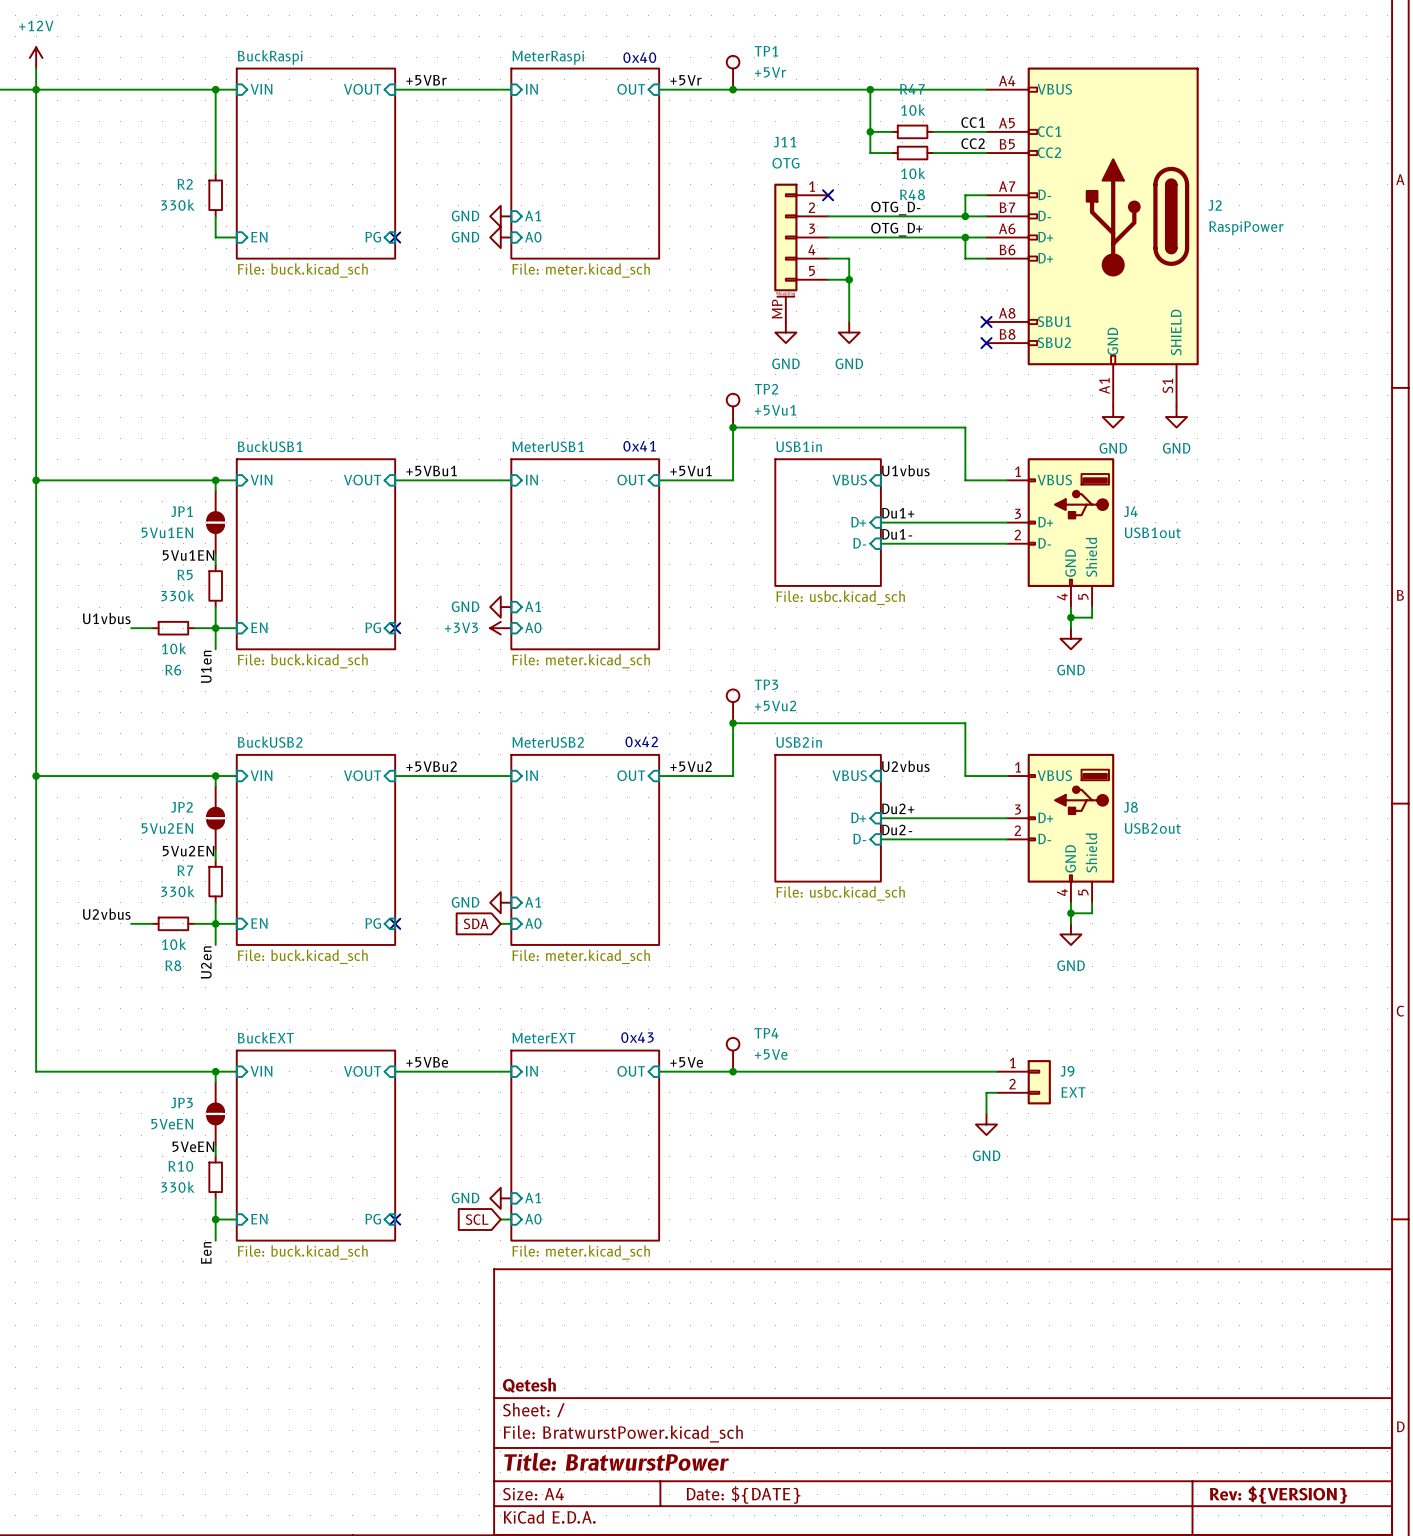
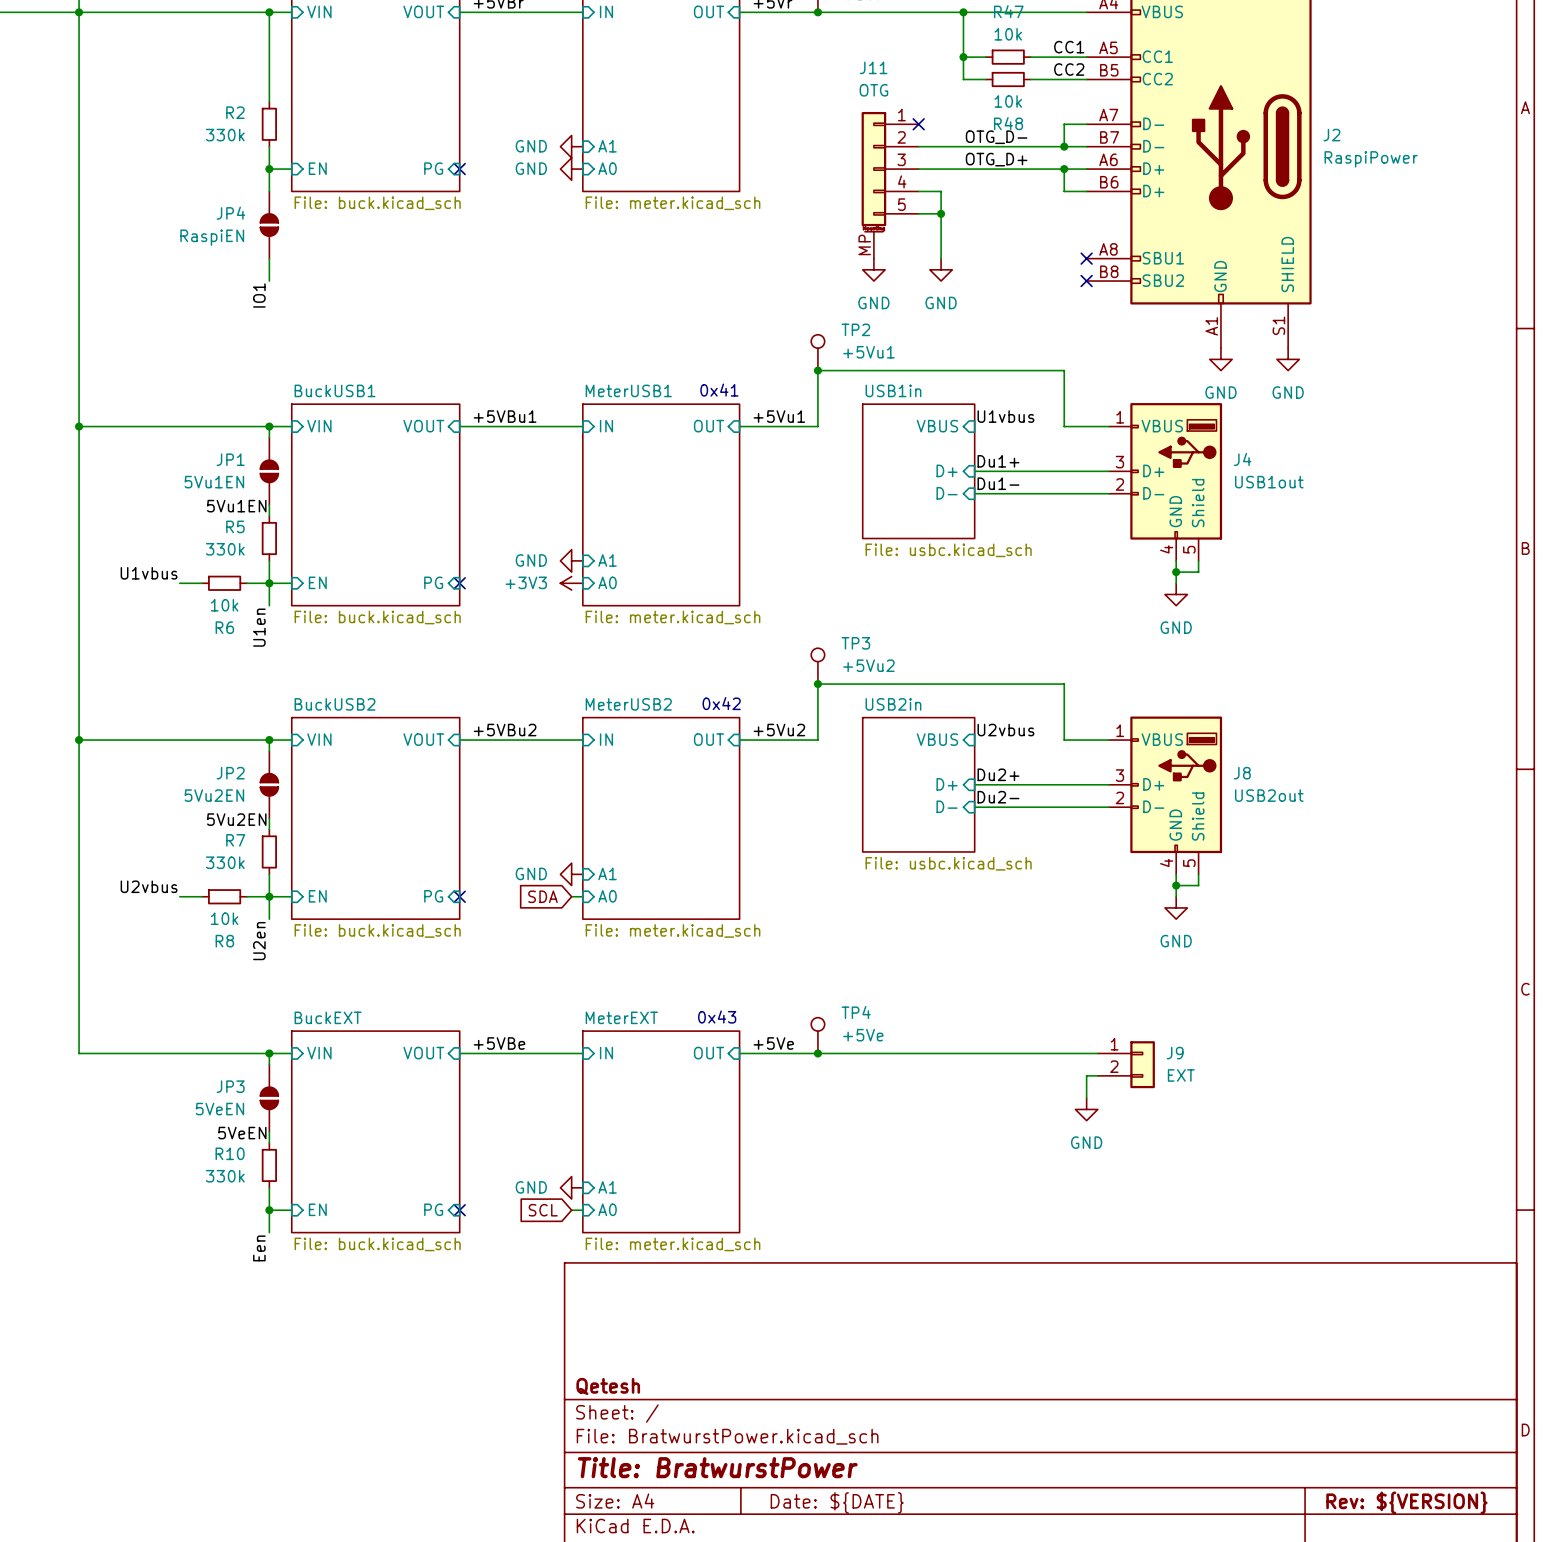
wire: none -> (269, 169) (269, 191)
junction: none -> (269, 169)
JP4: none -> RaspiEN (269, 225)
wire: none -> (269, 258) (269, 281)
label: none -> IO1 (259, 295)

